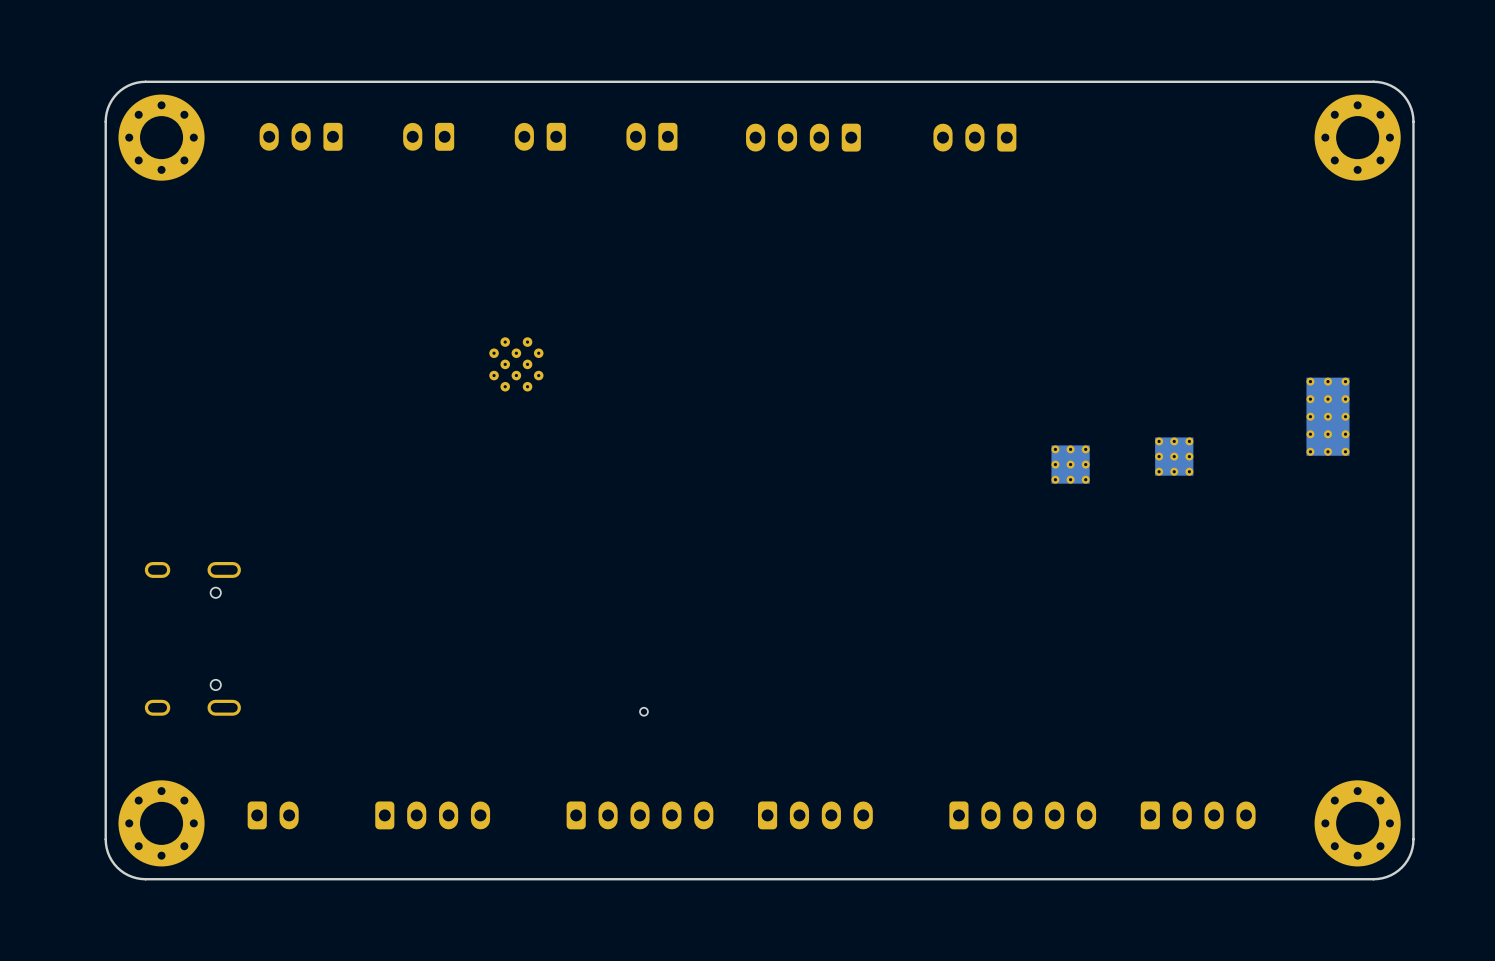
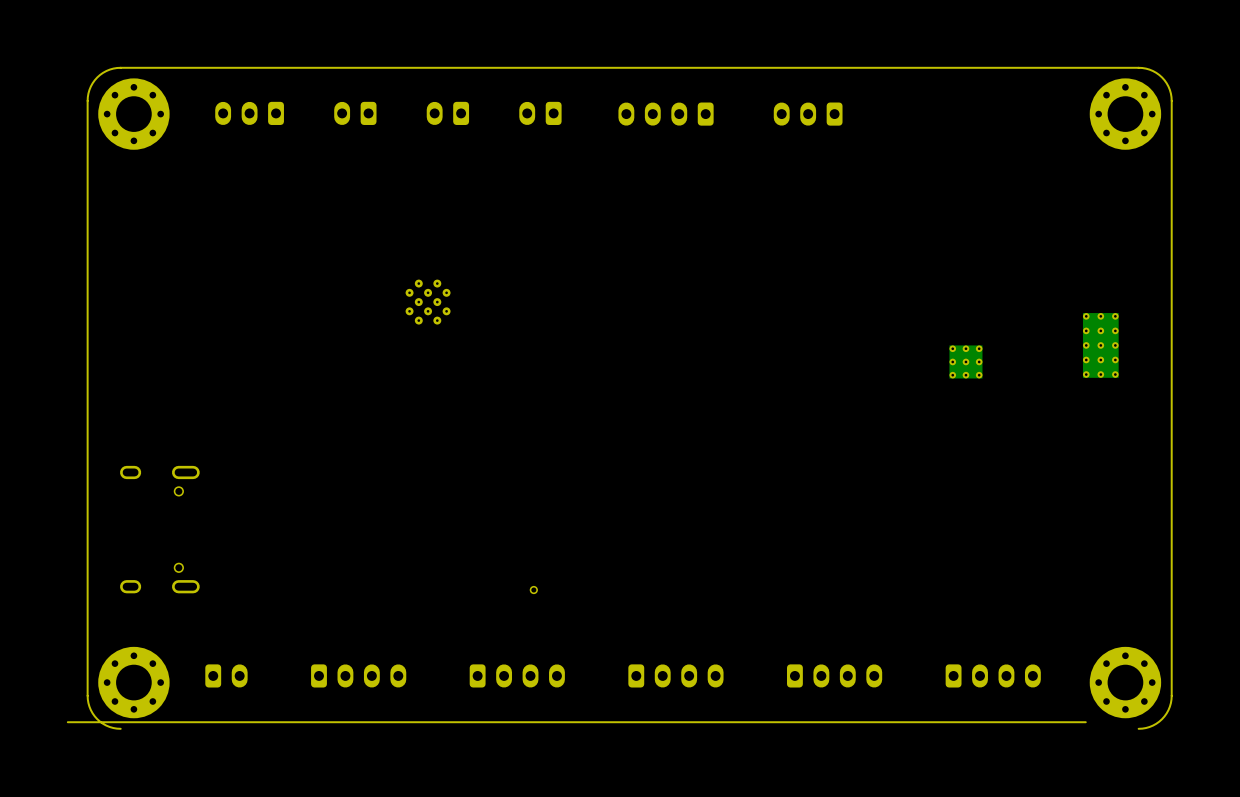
part: none -> (965, 361)
part: (1174, 456) -> none
part: (1070, 464) -> none
part footprint: [566, 801, 714, 830] -> [469, 664, 565, 688]
part footprint: [949, 801, 1097, 830] -> [787, 664, 883, 688]
board edge: (1373, 879) (145, 879) -> (1085, 722) (67, 722)

